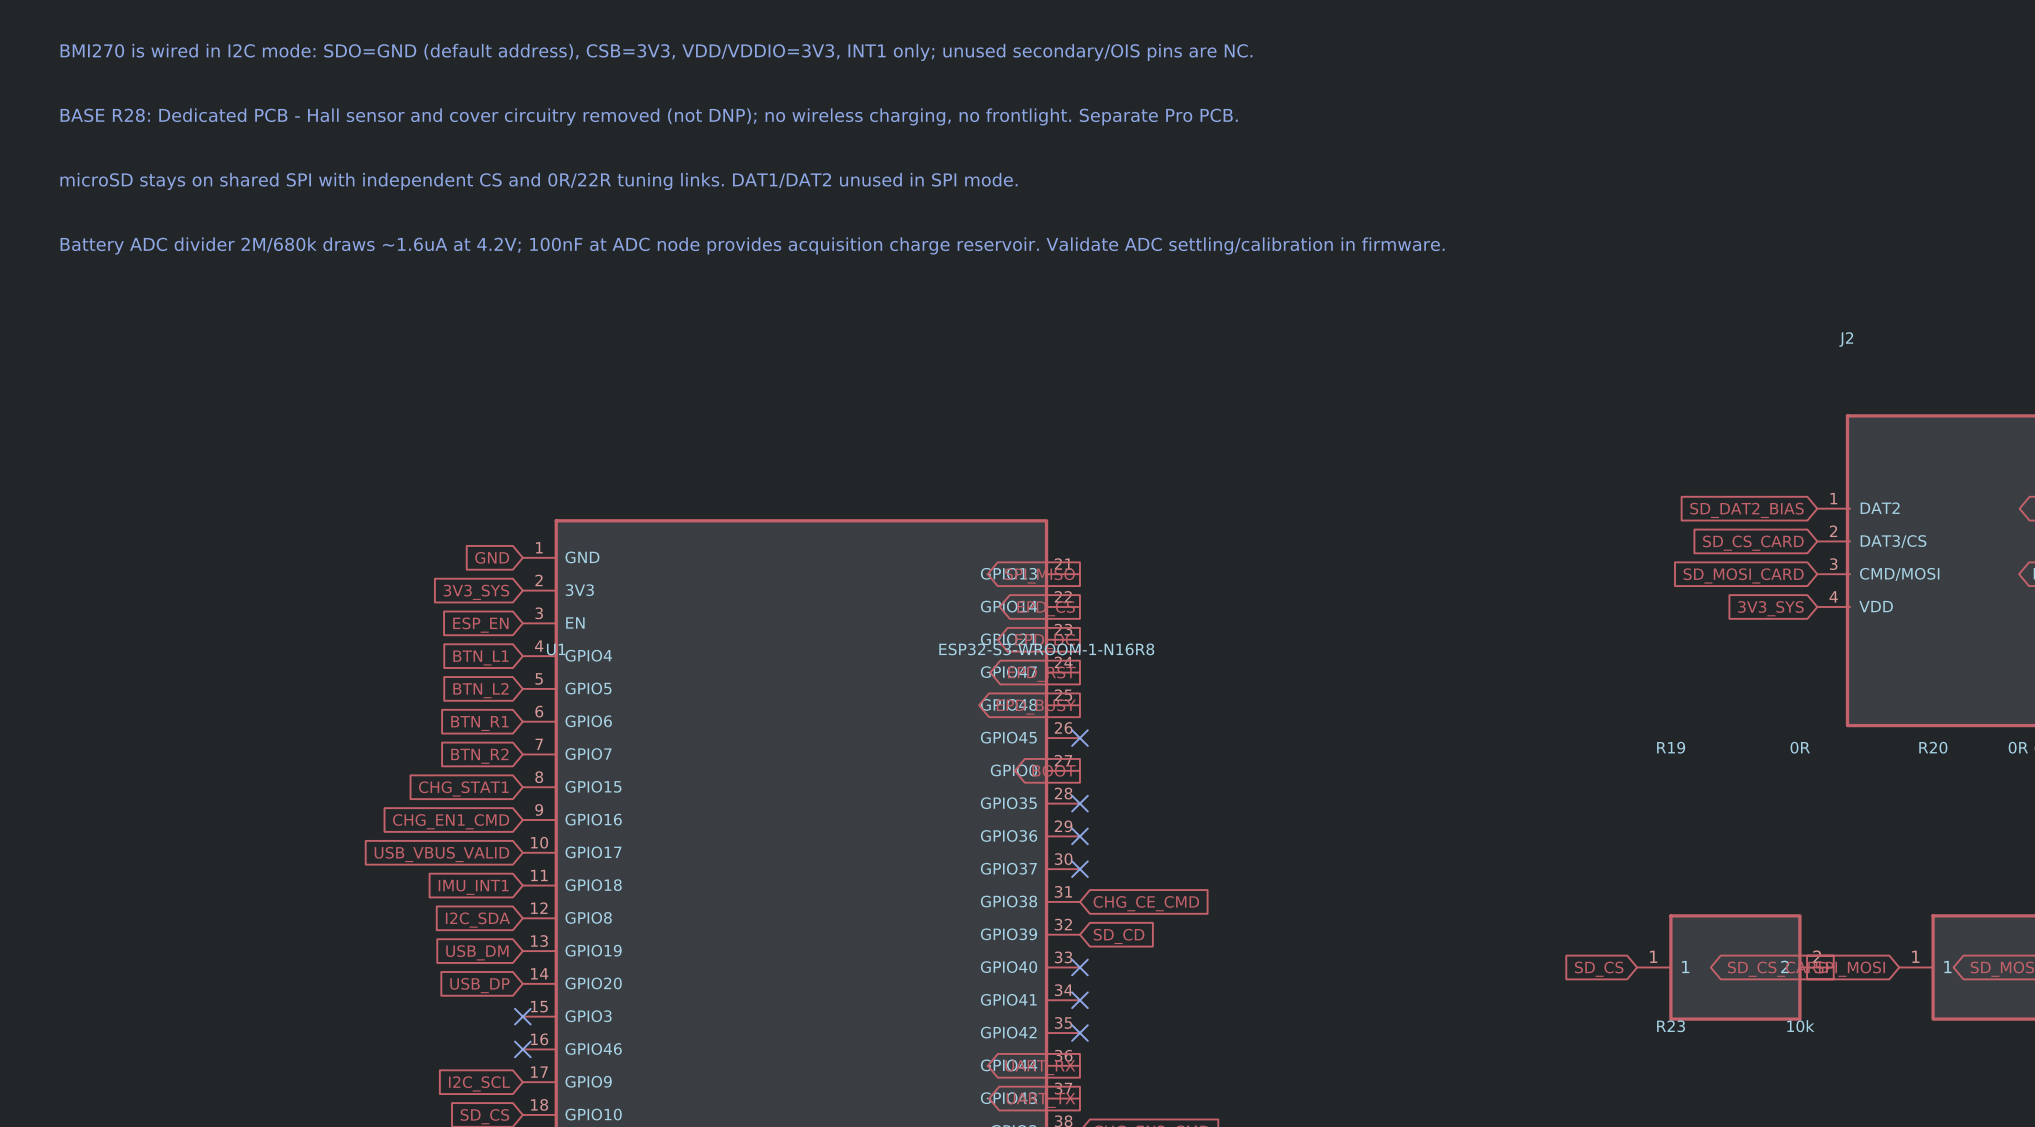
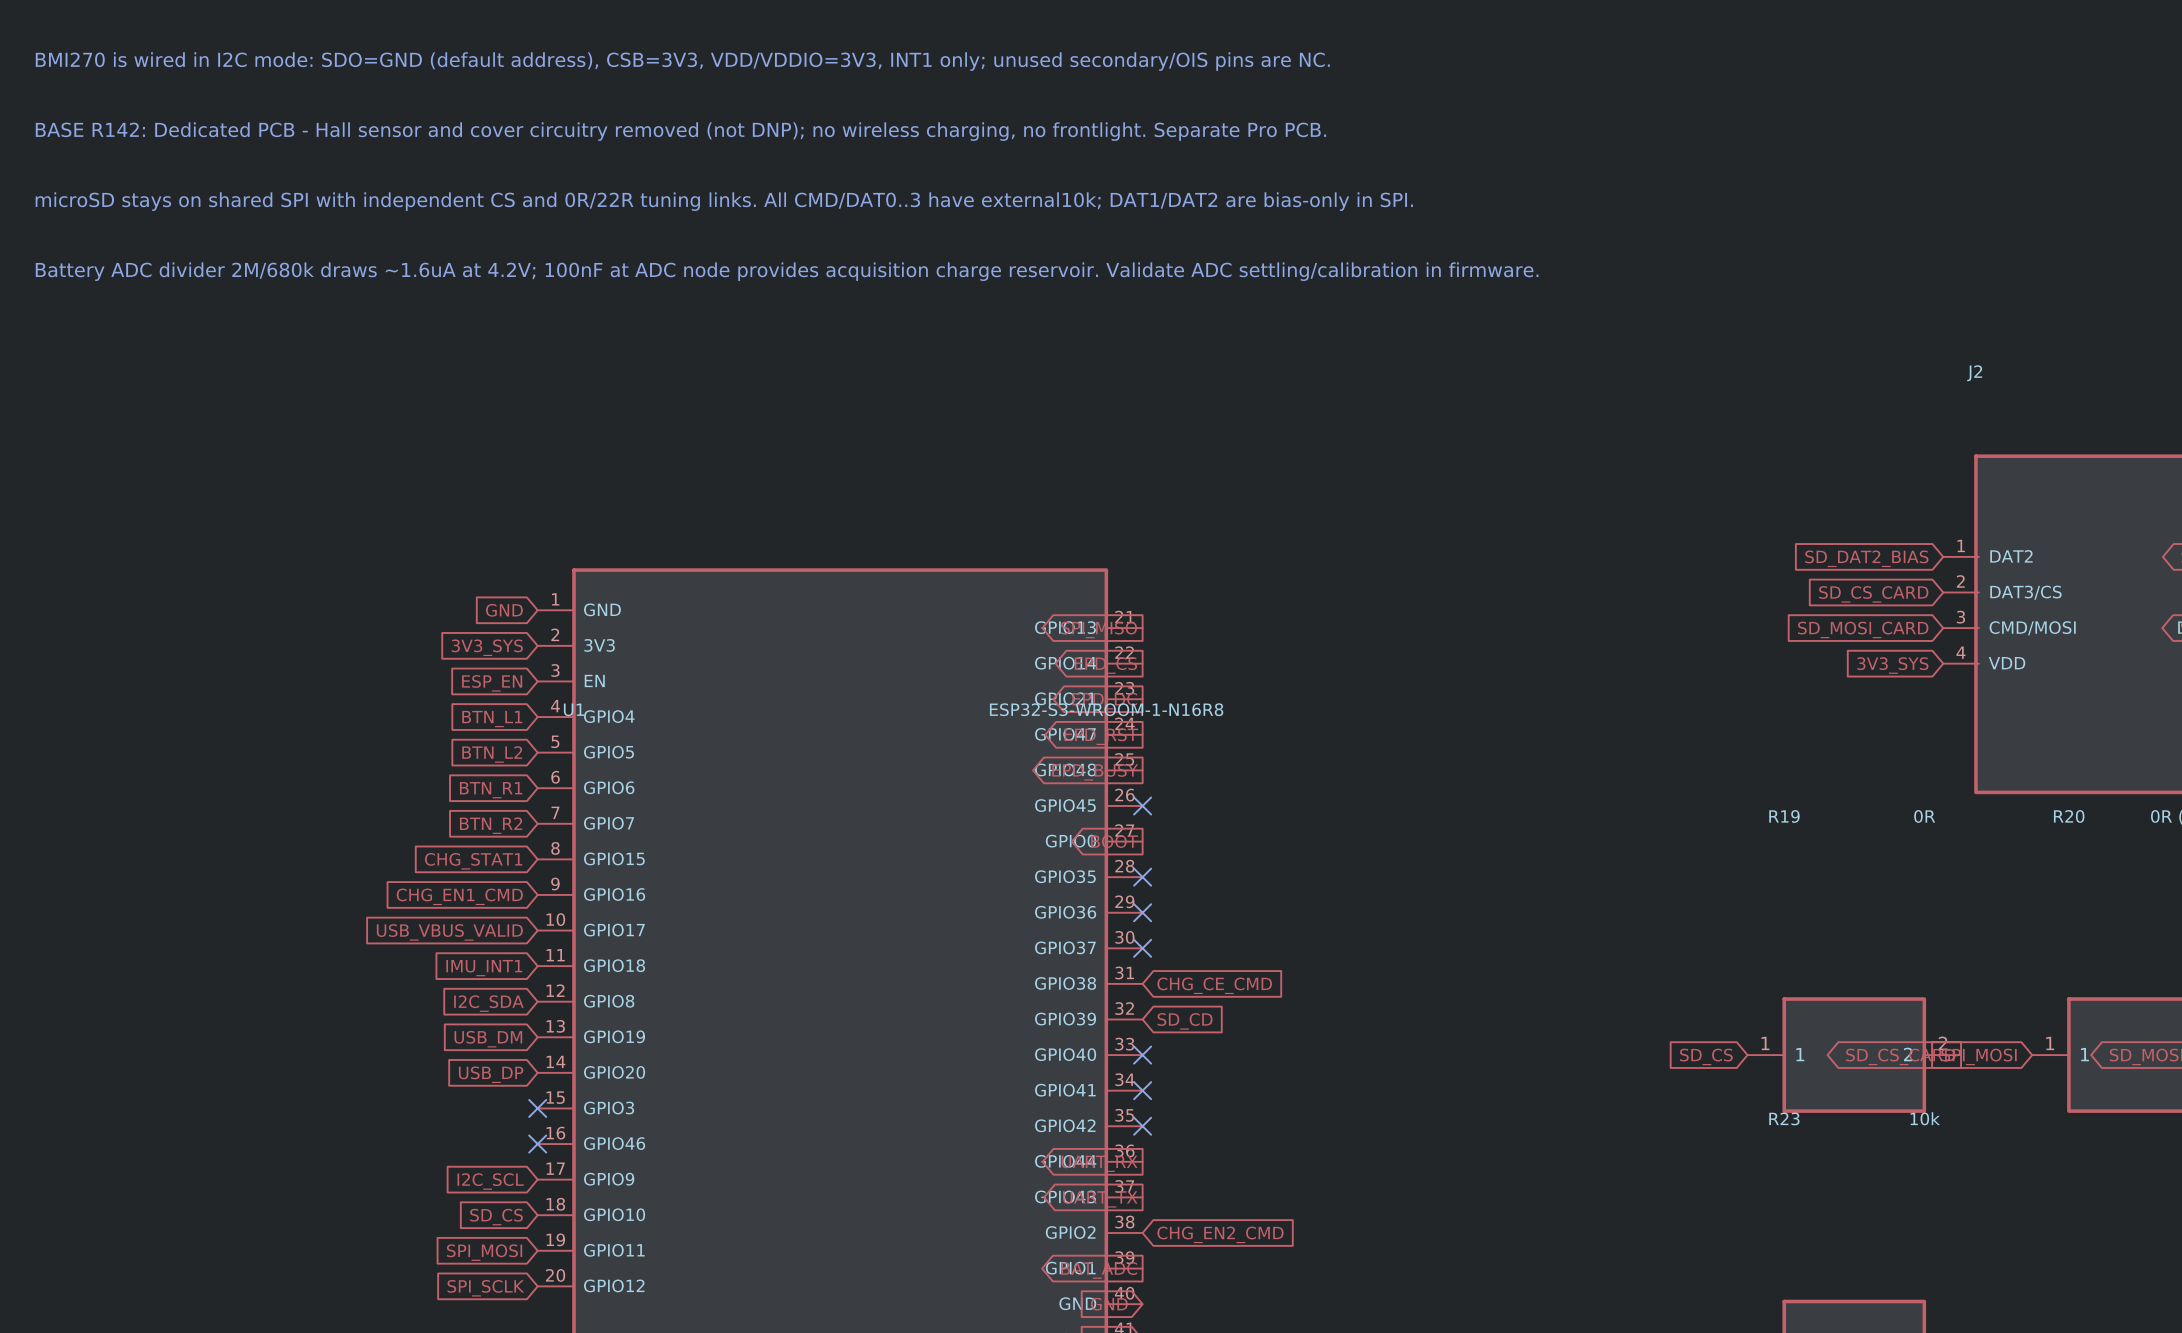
text: BASE R28: Dedicated PCB - Hall sensor and cover circuitry removed (not DNP); no wireless charging, no frontlight. Separate Pro PCB. (649, 116) -> BASE R142: Dedicated PCB - Hall sensor and cover circuitry removed (not DNP); no wireless charging, no frontlight. Separate Pro PCB. (680, 131)
text: microSD stays on shared SPI with independent CS and 0R/22R tuning links. DAT1/DAT2 unused in SPI mode. (538, 181) -> microSD stays on shared SPI with independent CS and 0R/22R tuning links. All CMD/DAT0..3 have external10k; DAT1/DAT2 are bias-only in SPI. (724, 201)

